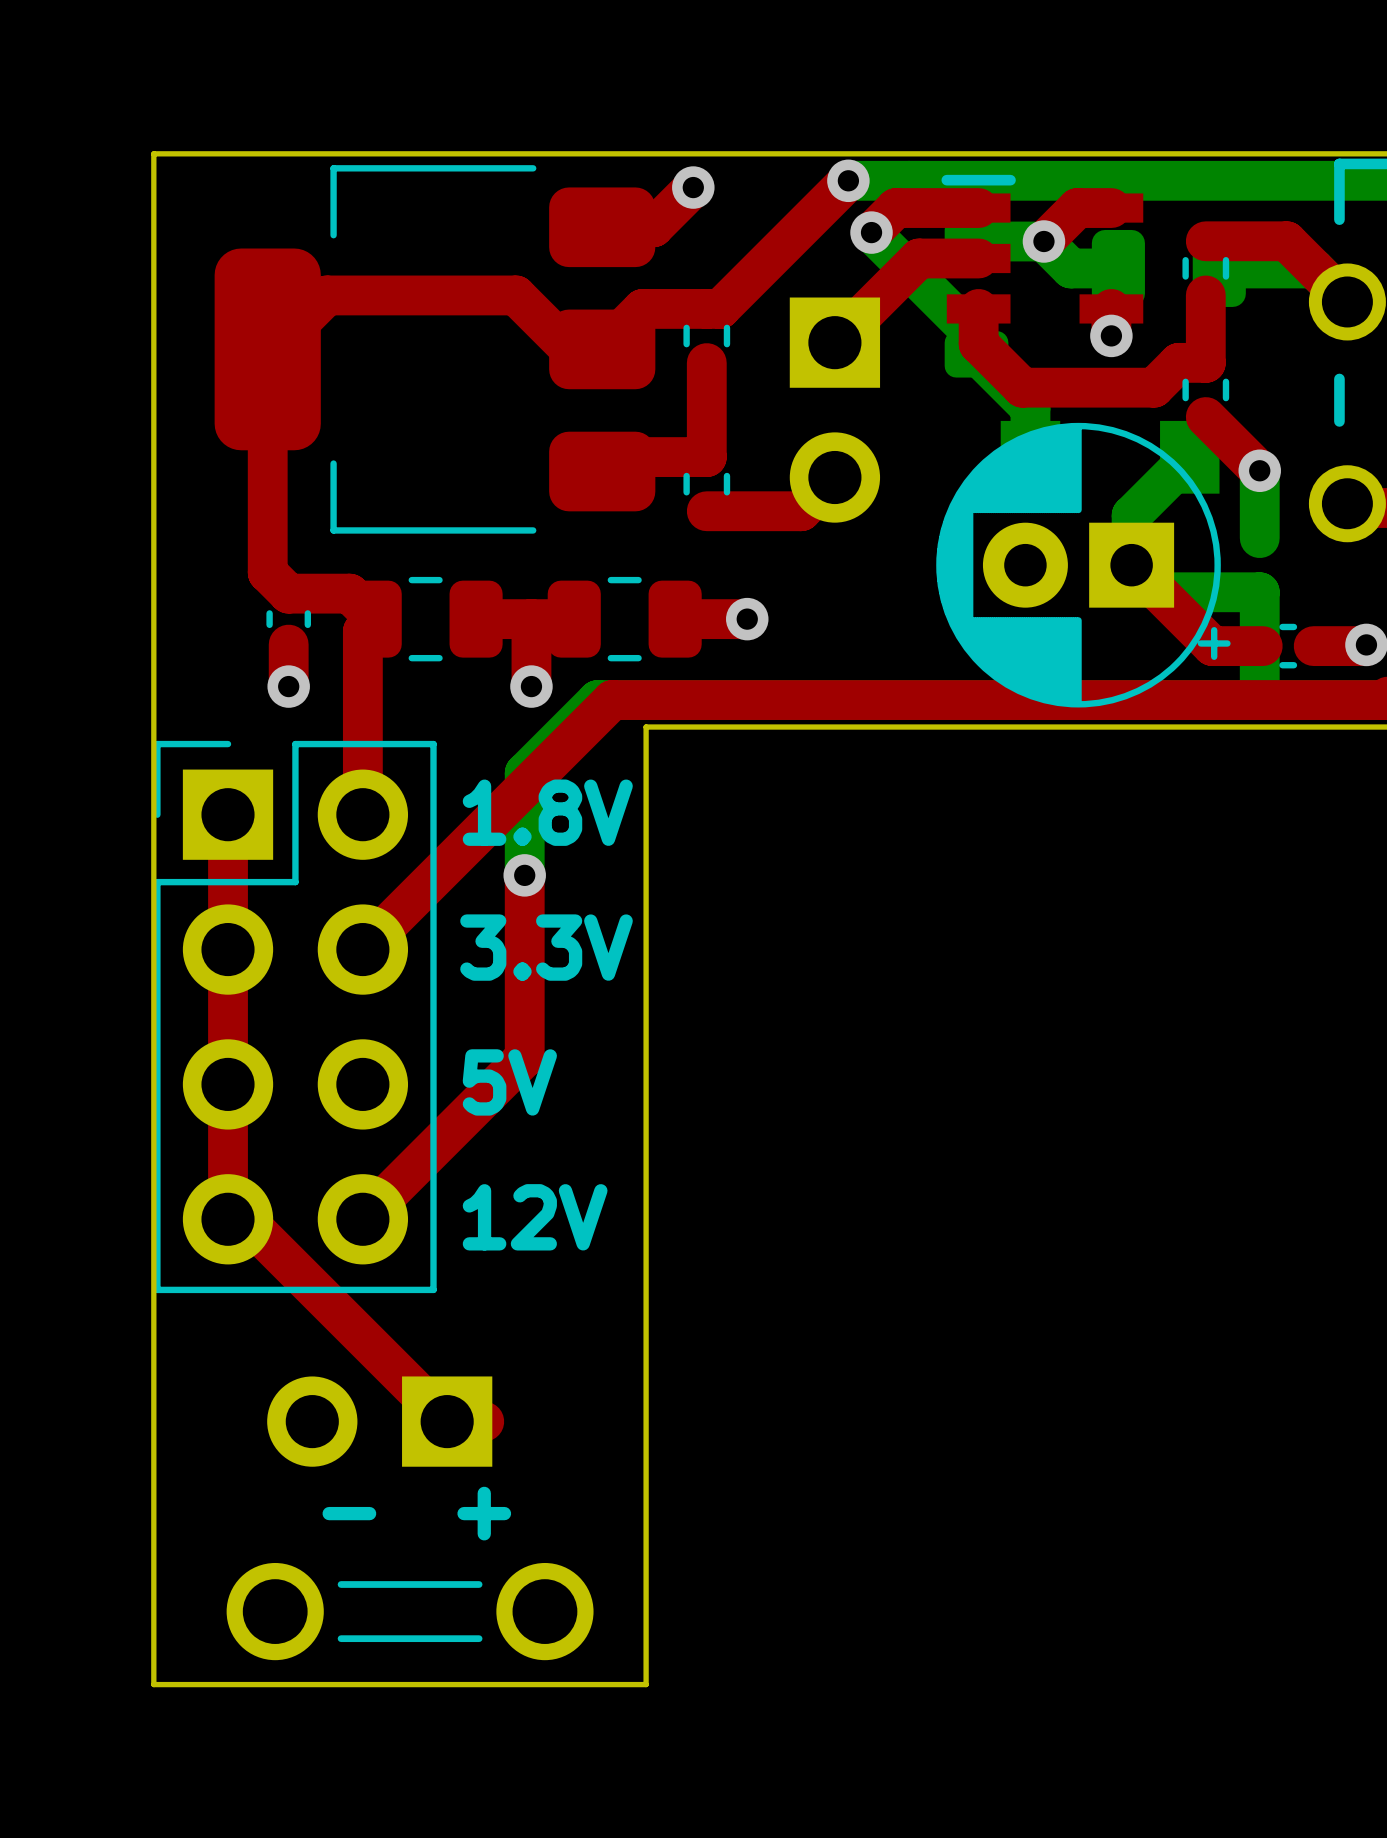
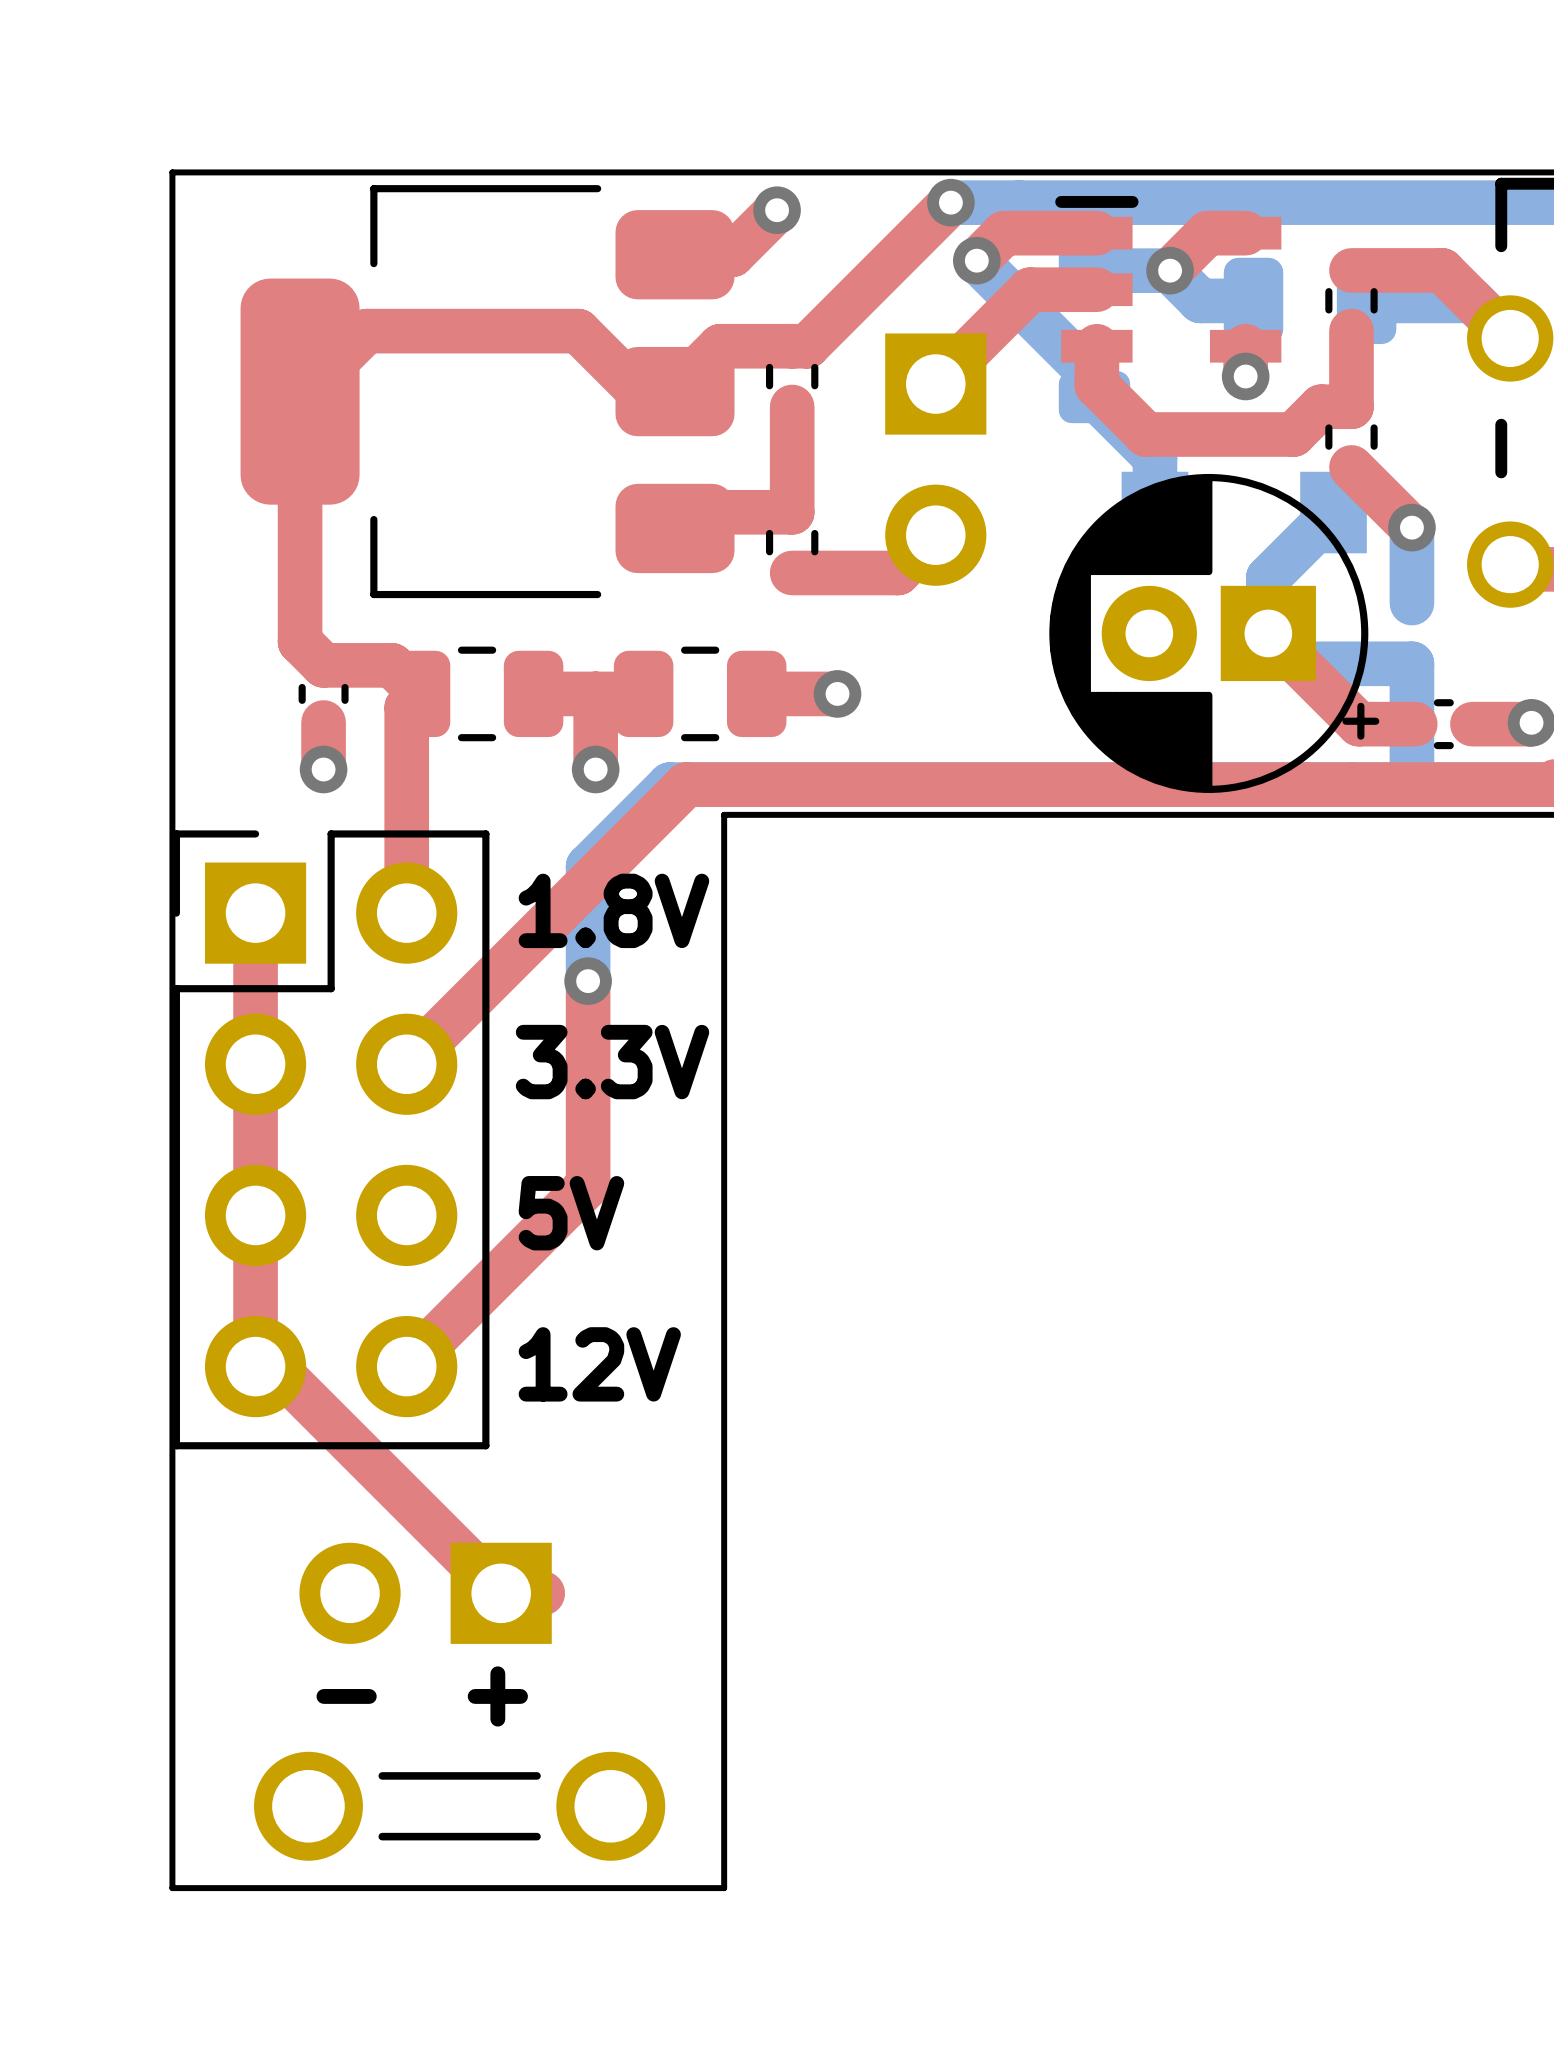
text position: - (349, 1513) -> - (346, 1696)
text position: + (484, 1513) -> + (497, 1696)

